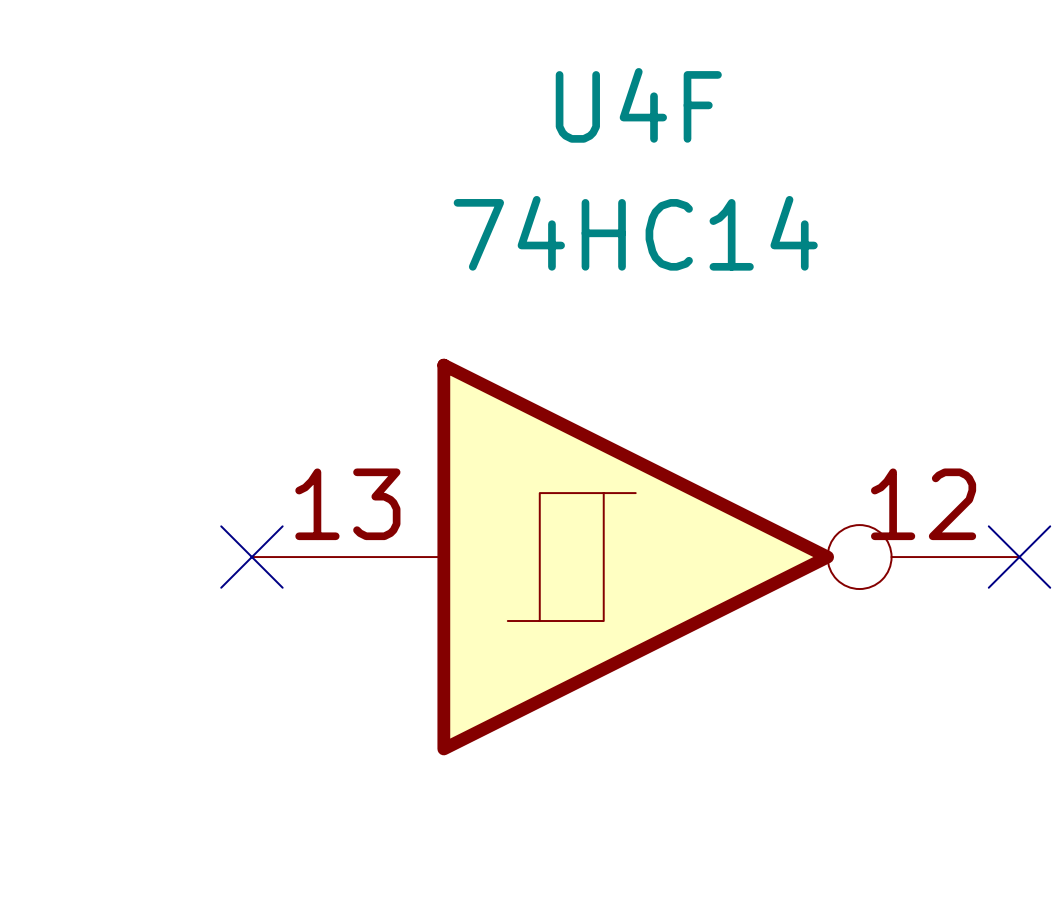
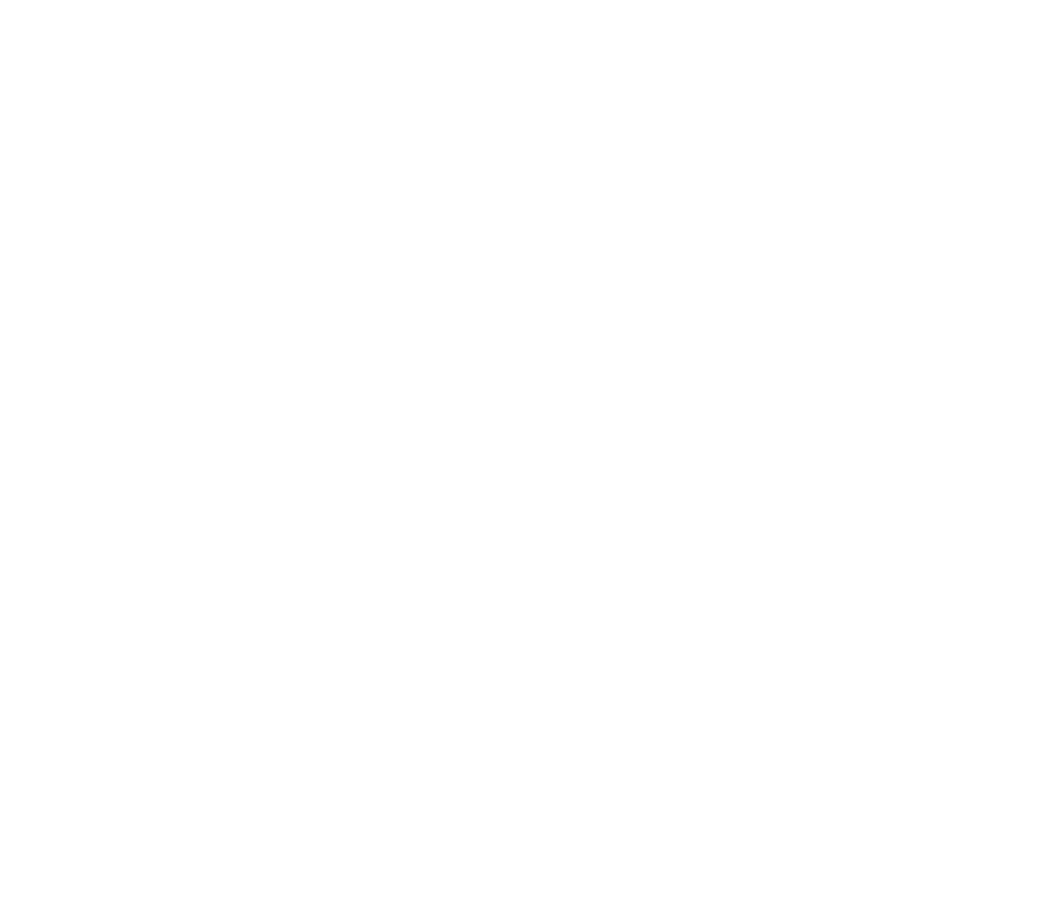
no-connect mark: (251, 557) -> none
U4F: 74HC14 (635, 557) -> none
no-connect mark: (1019, 557) -> none

